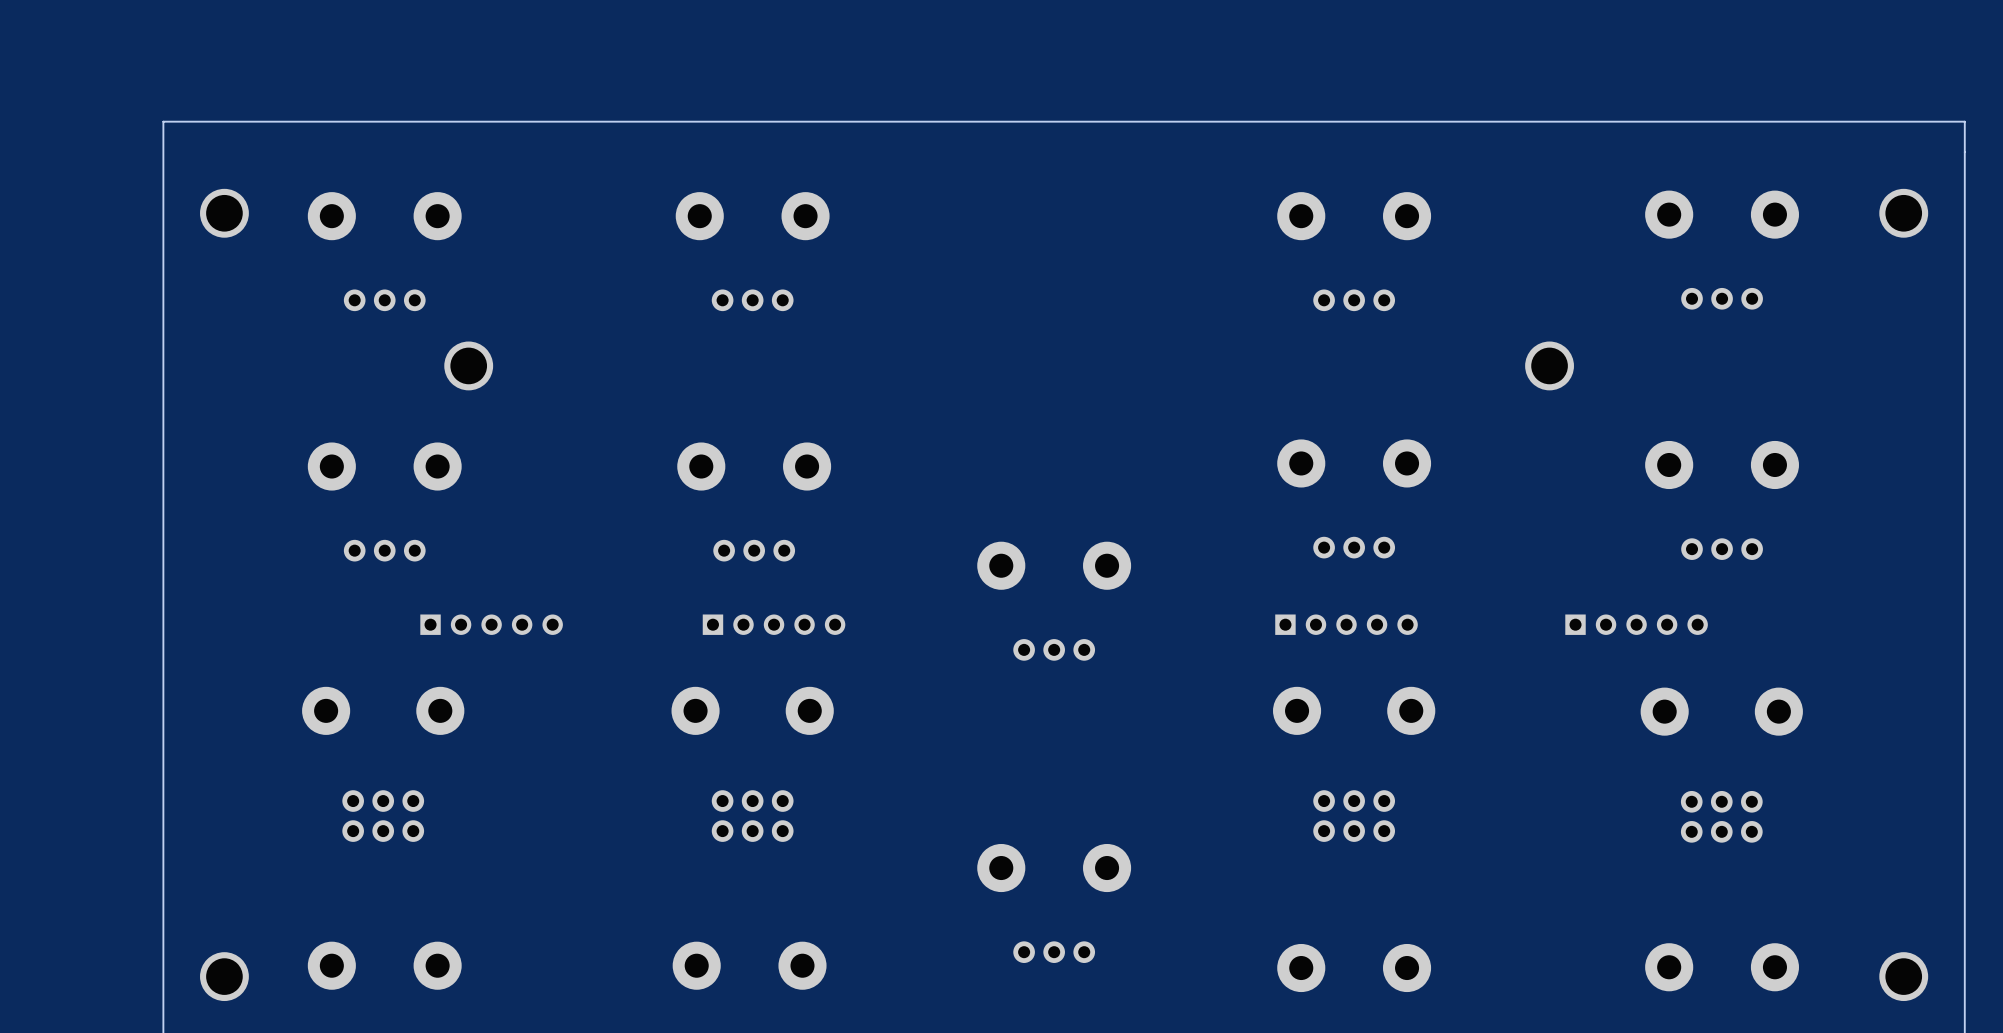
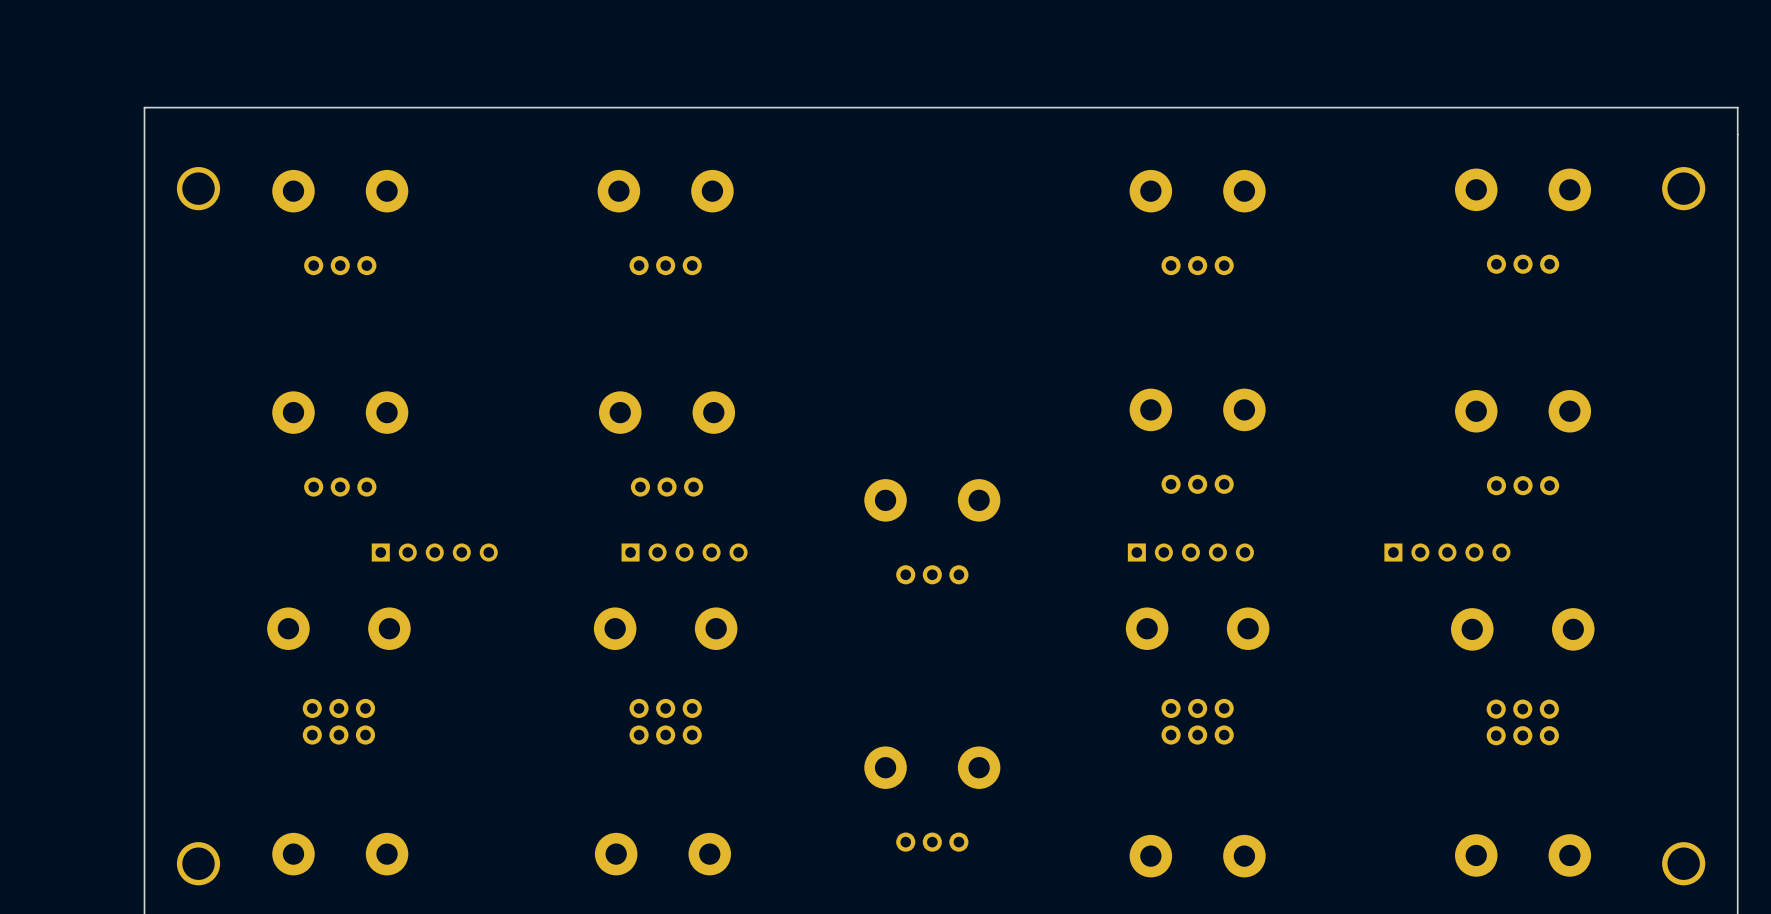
part: (468, 365) -> none
part: (1549, 365) -> none

